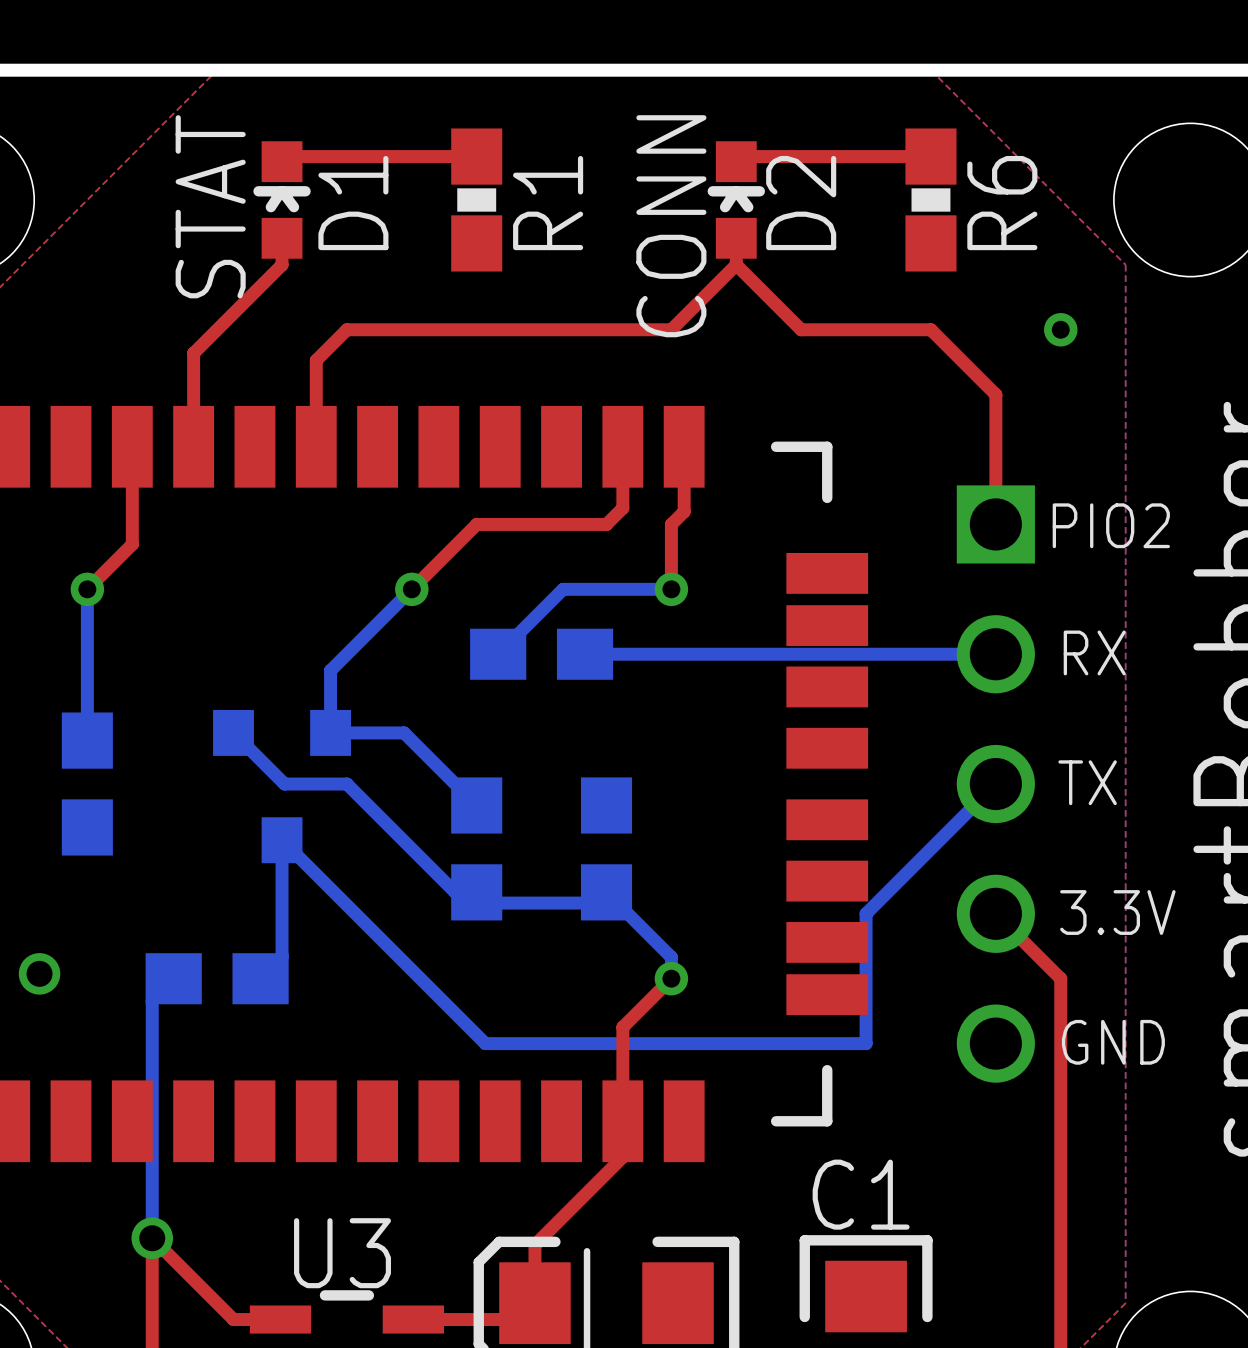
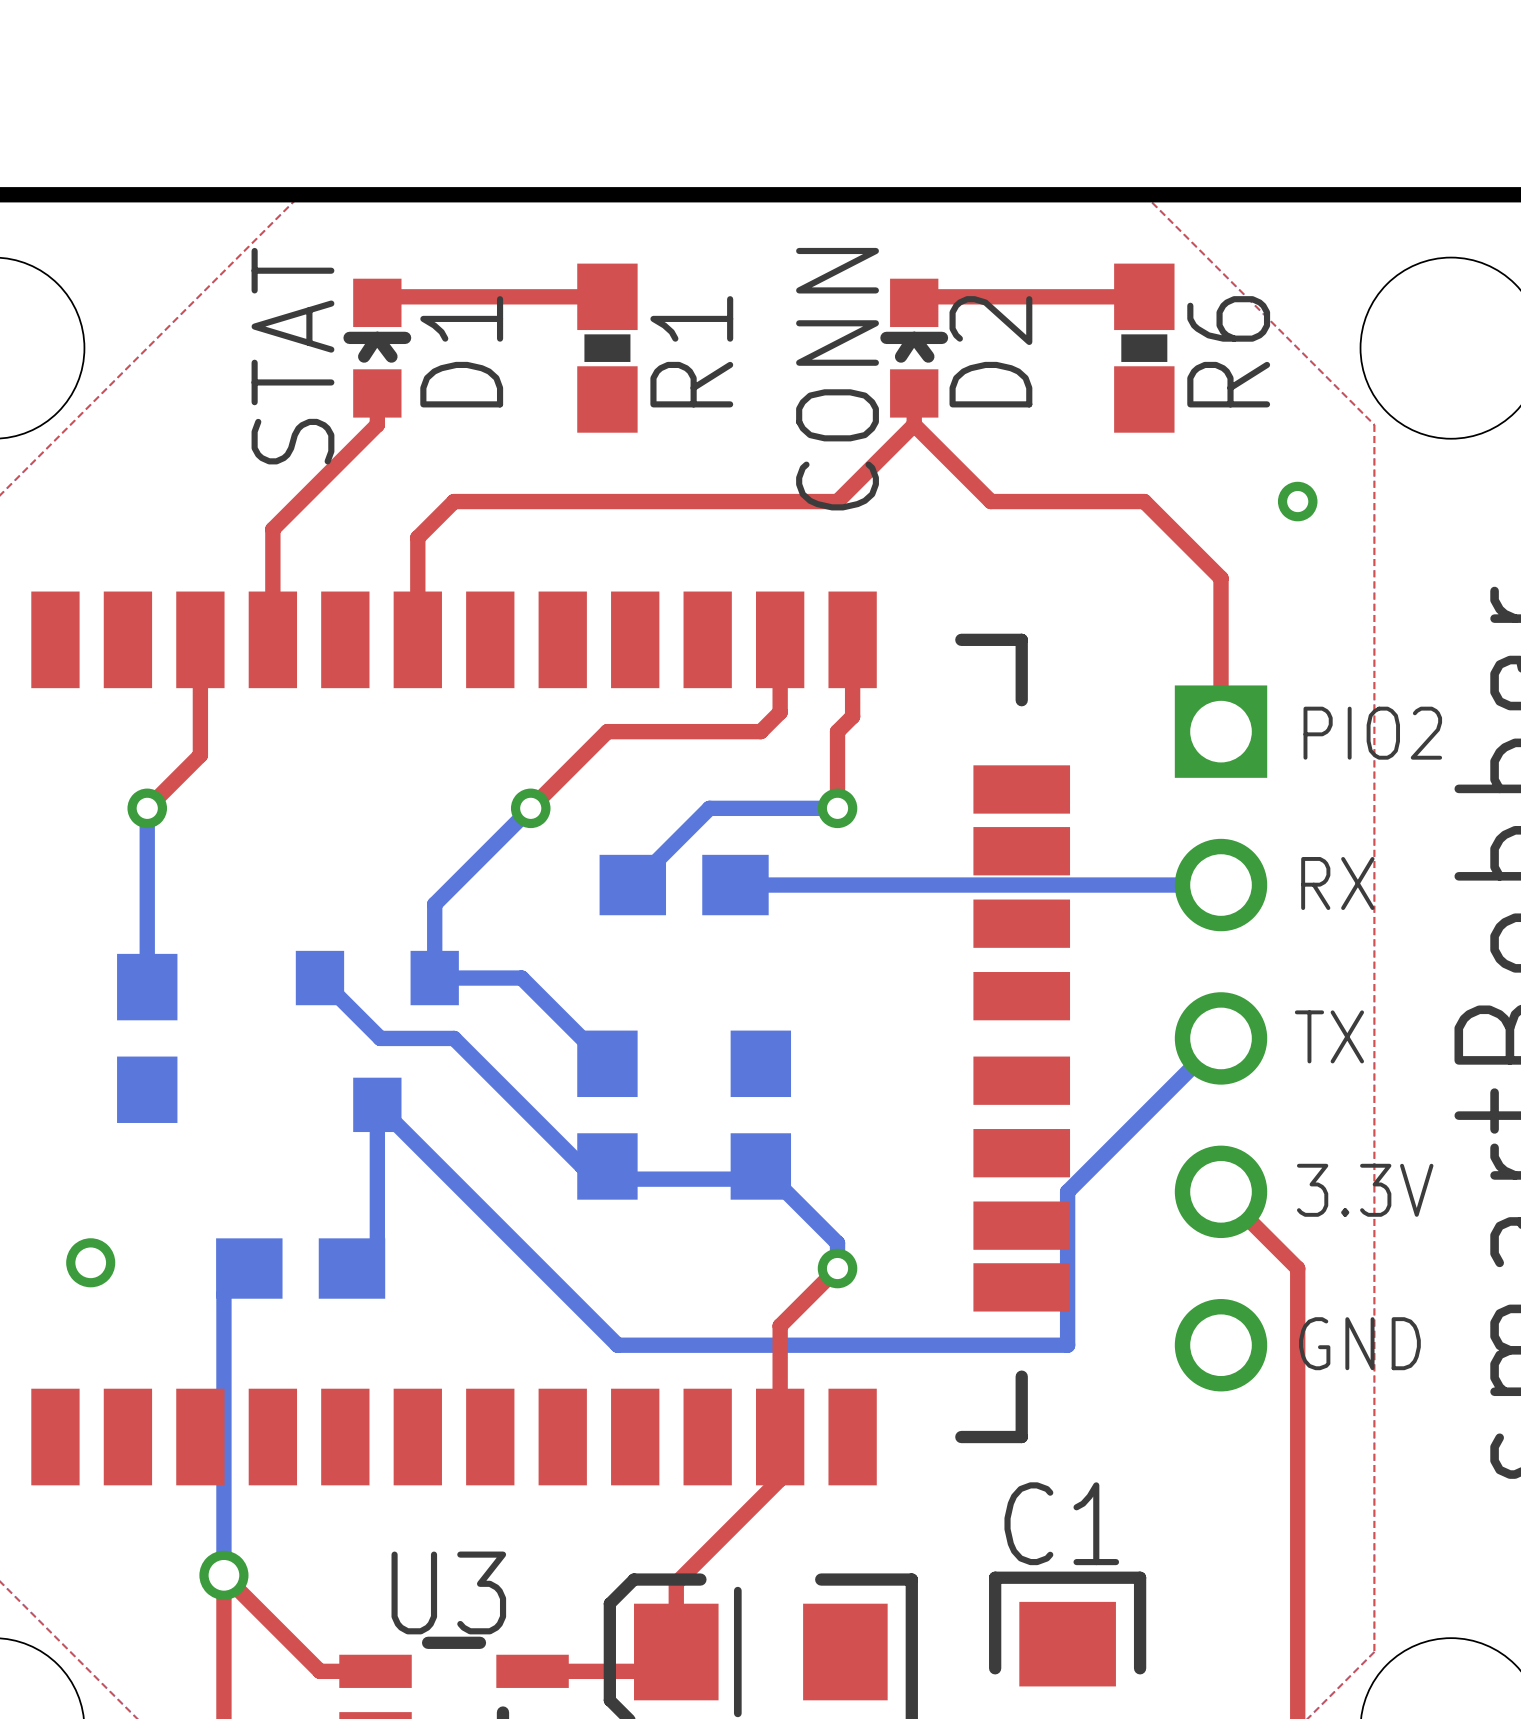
text position: PIO2 (1111, 525) -> PIO2 (1372, 733)

